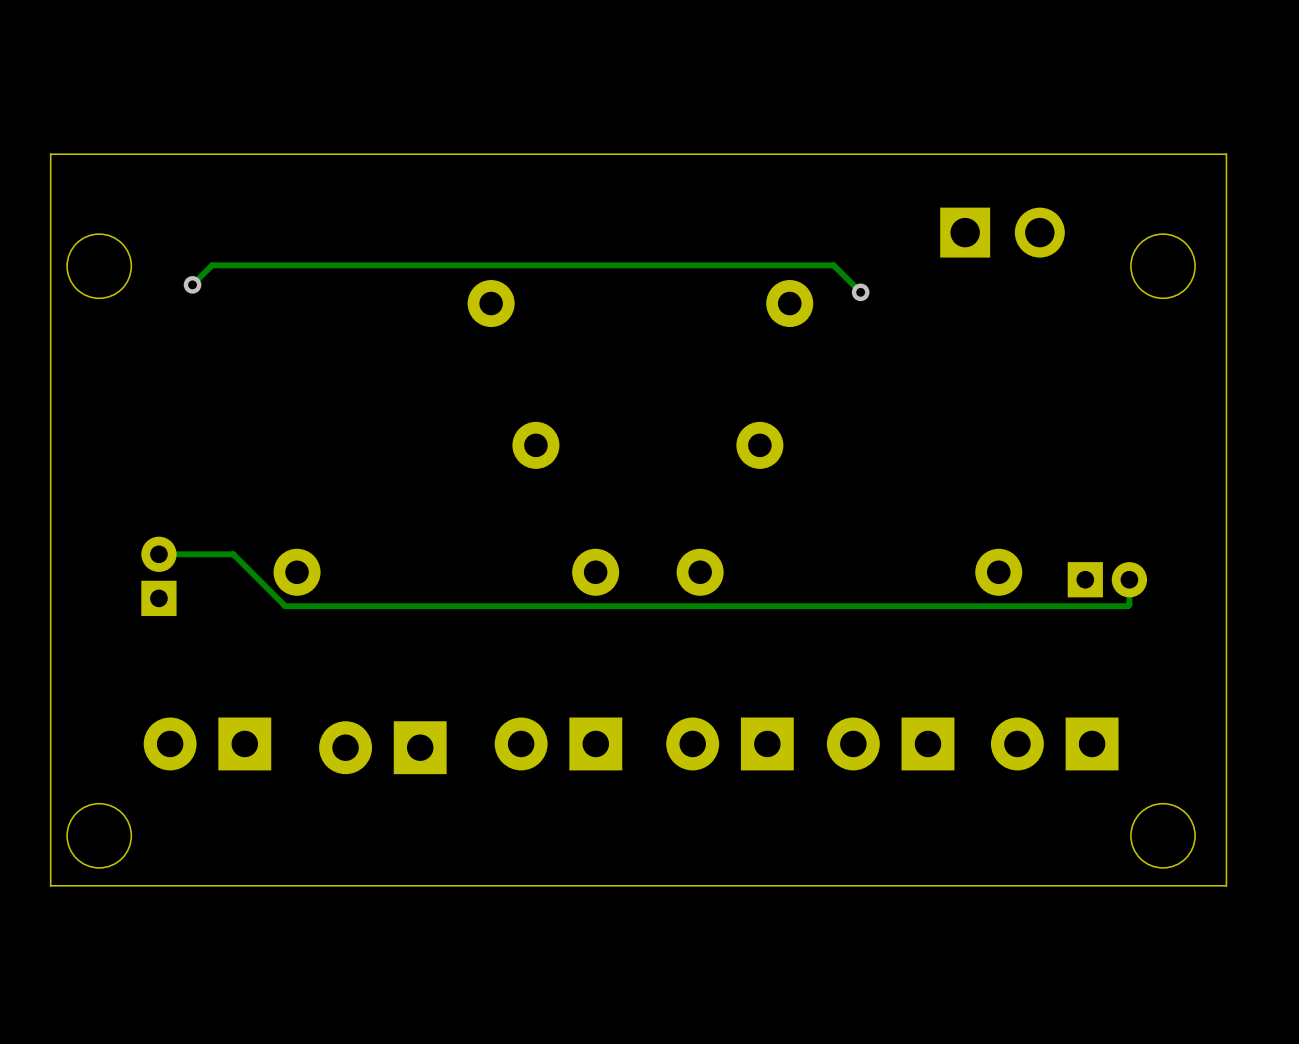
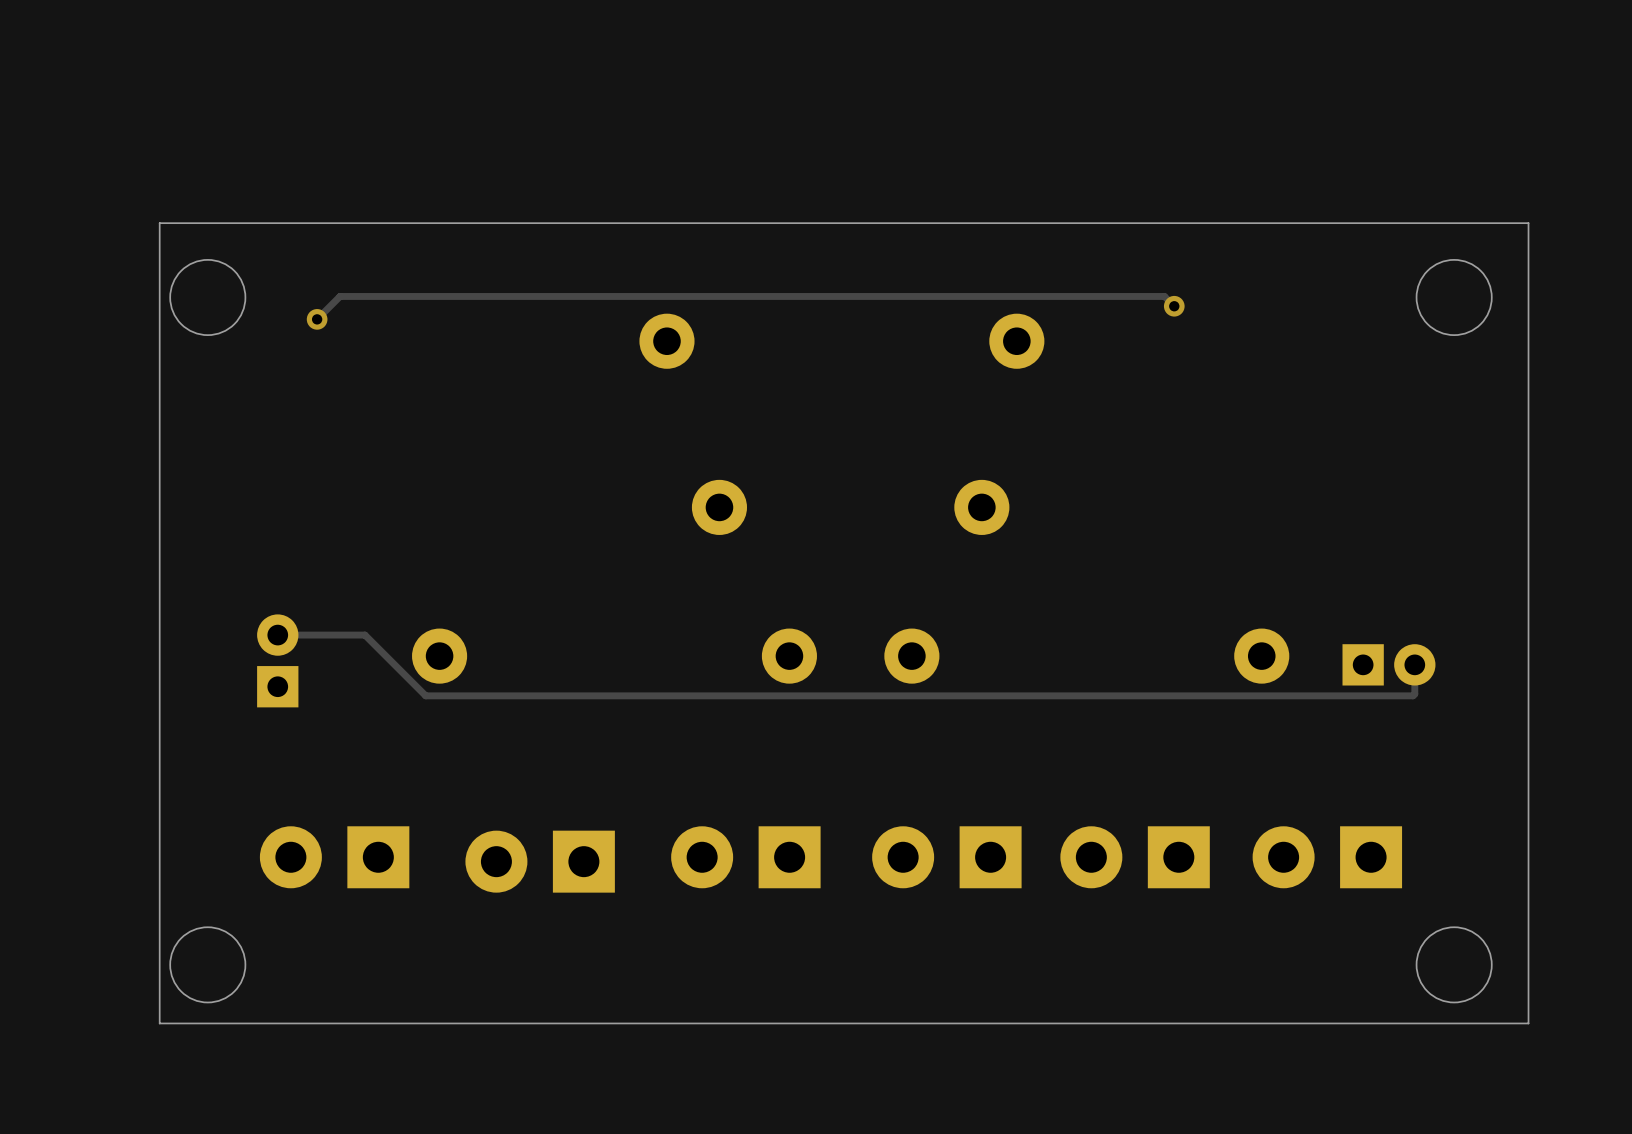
board edge: (1226, 202) (1226, 154) (50, 154) (50, 885) (58, 885) -> (1528, 223) (159, 223) (159, 1023)
part: (1002, 232) -> none
track: (833, 265) (860, 292) -> (1068, 296) (1164, 296) (1174, 306)
via position: (860, 292) -> (1174, 306)

